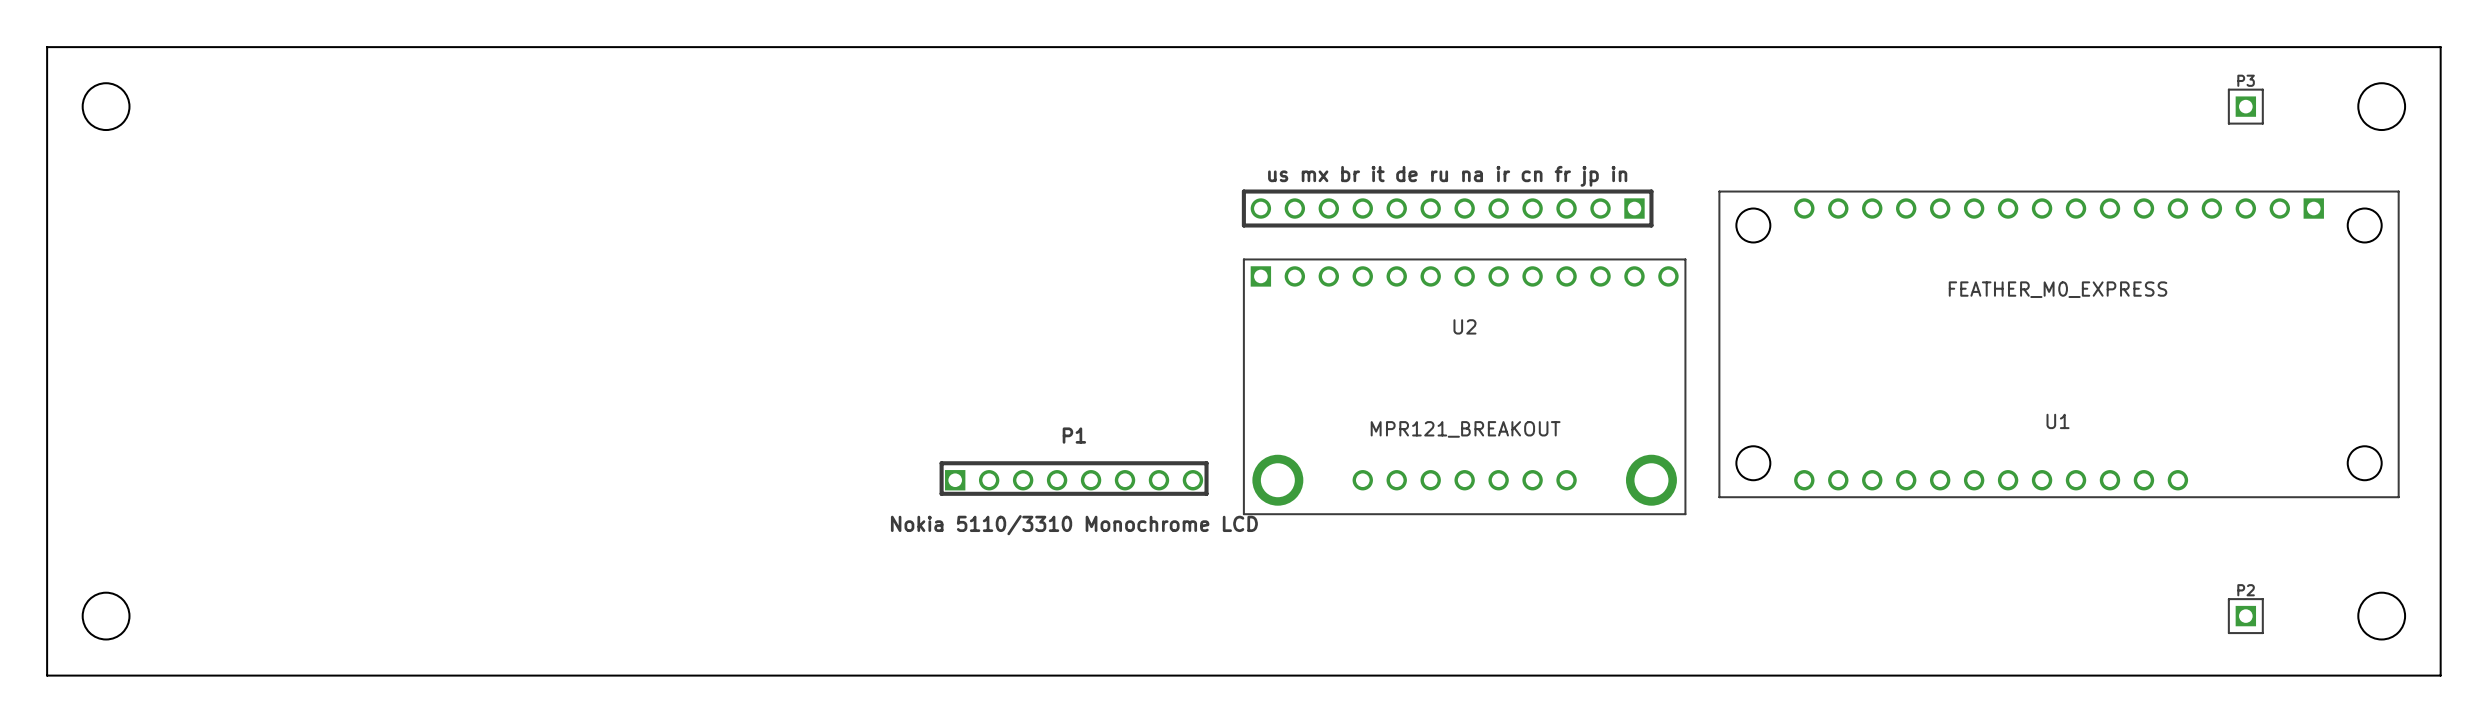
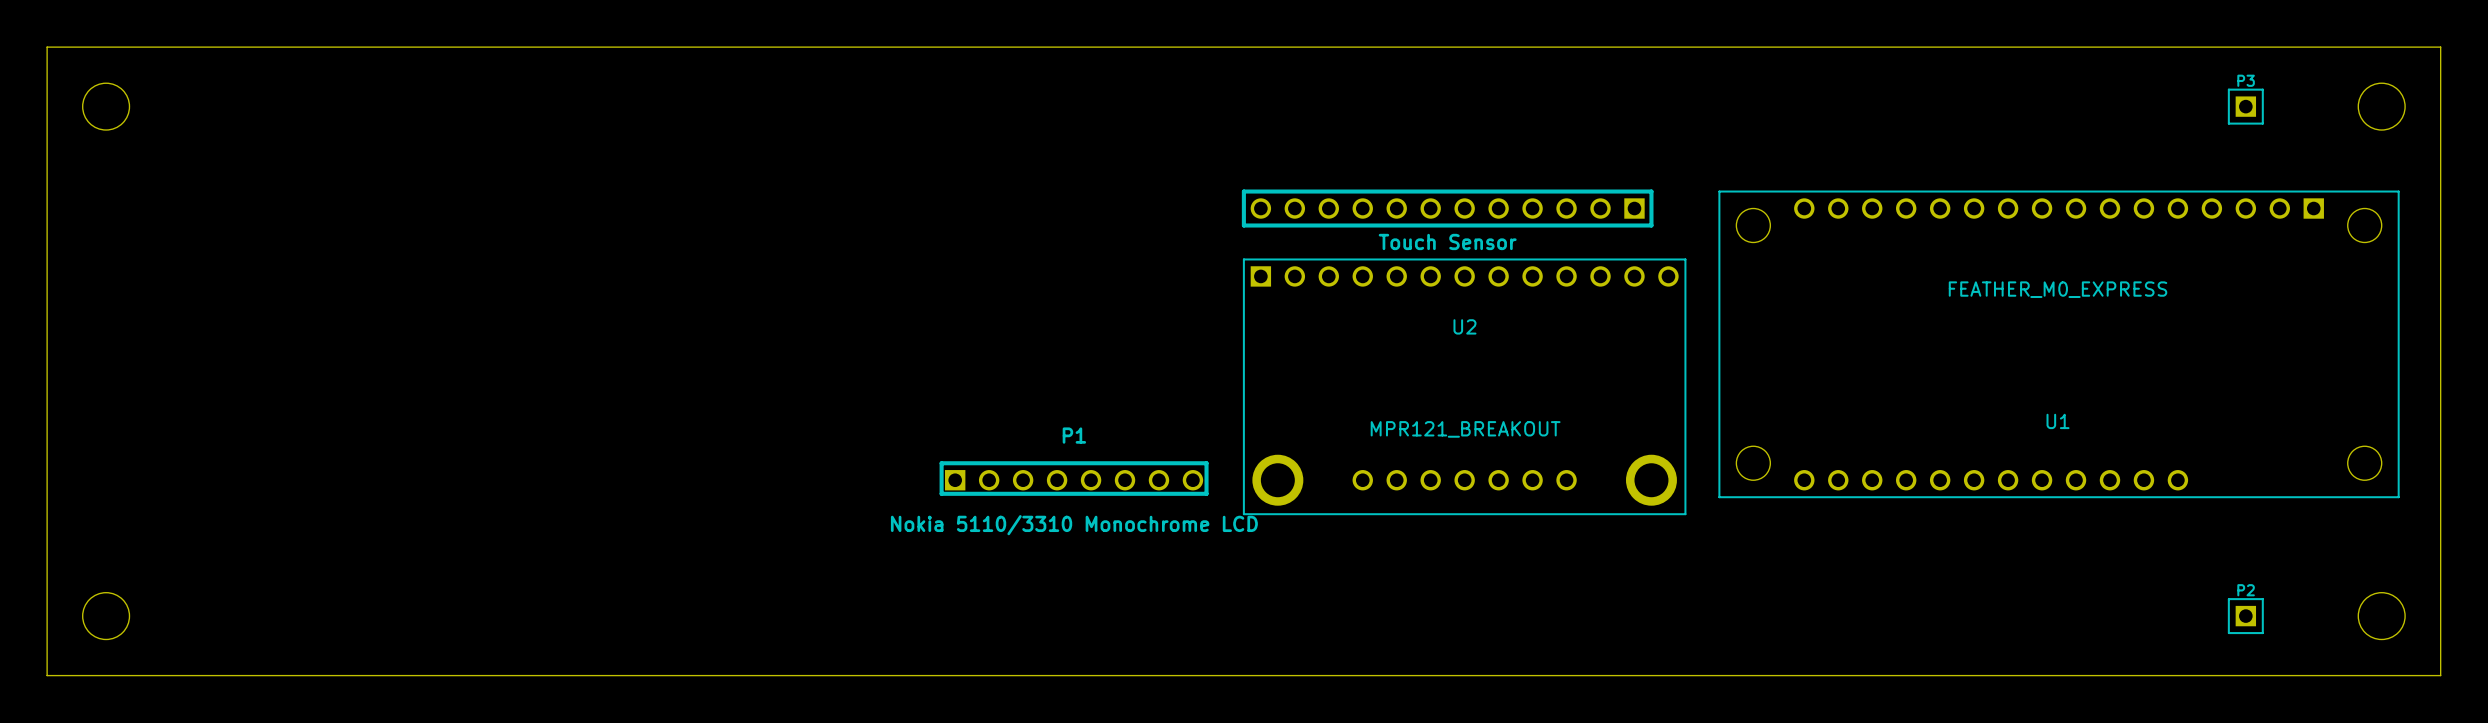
part value: us mx br it de ru na ir cn fr jp in (1447, 176) -> Touch Sensor (1447, 241)

